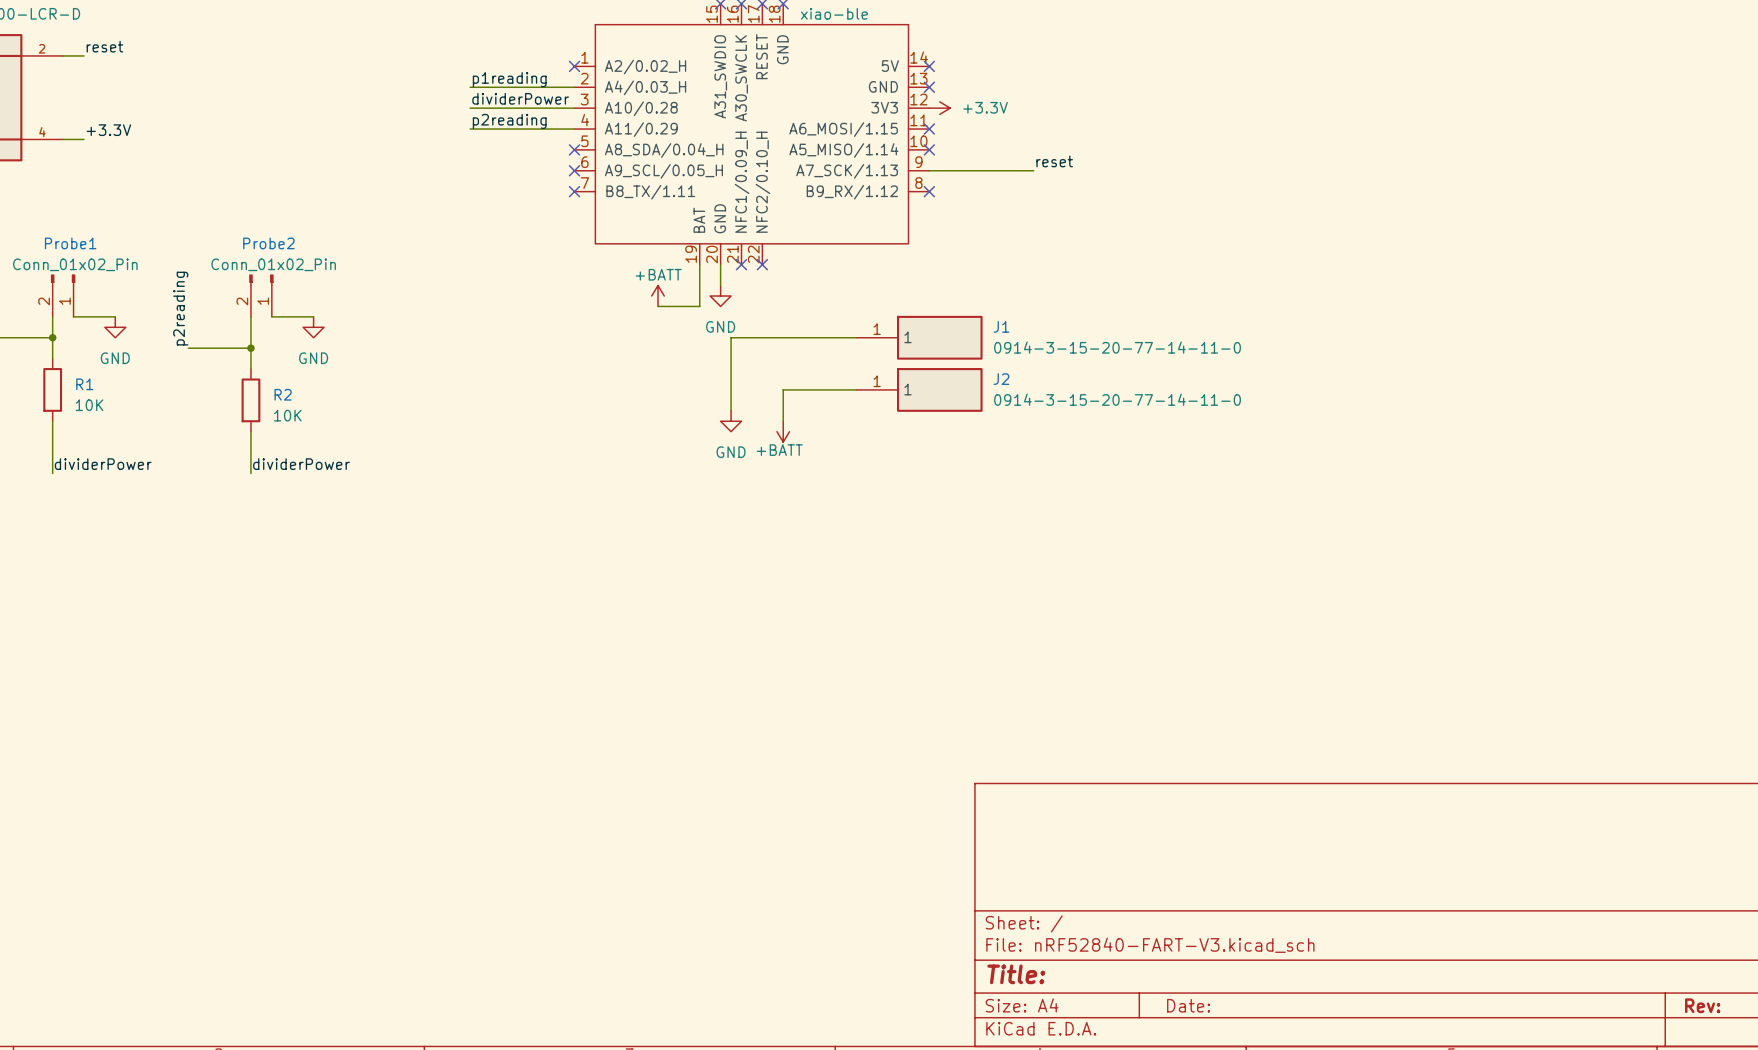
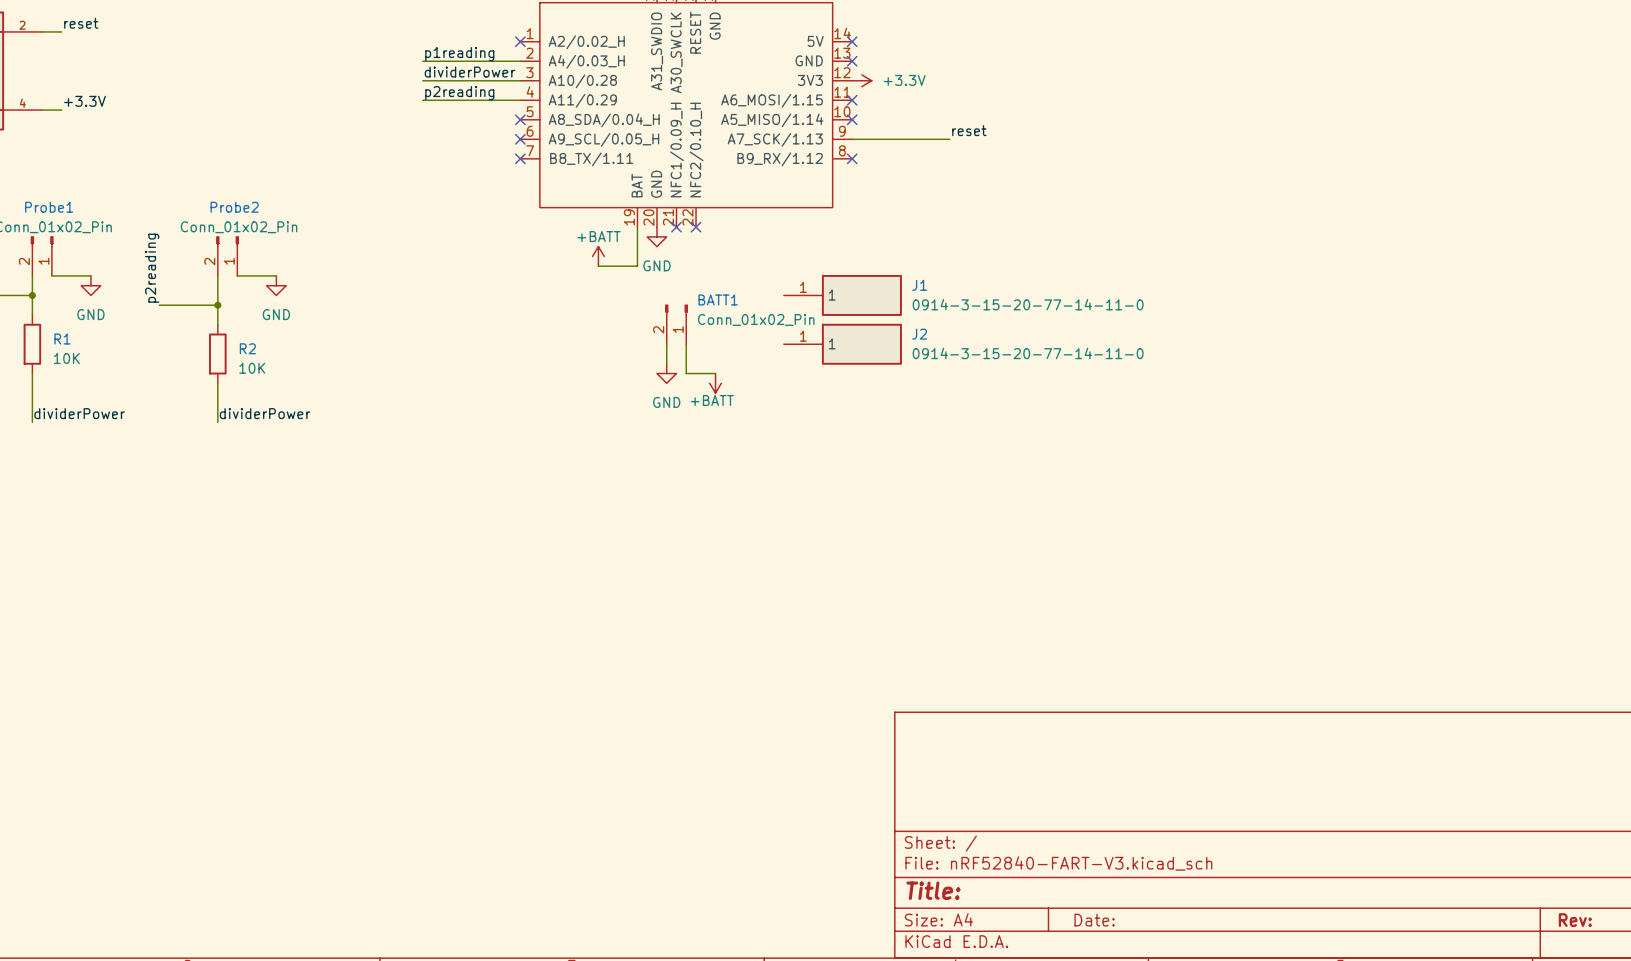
power symbol position: GND (720, 296) -> GND (656, 236)
wire: (856, 337) (731, 337) (731, 389) -> none
BATT1: none -> Conn_01x02_Pin (676, 324)
wire: (856, 389) (783, 389) (783, 421) -> (686, 344) (686, 373) (715, 373)

